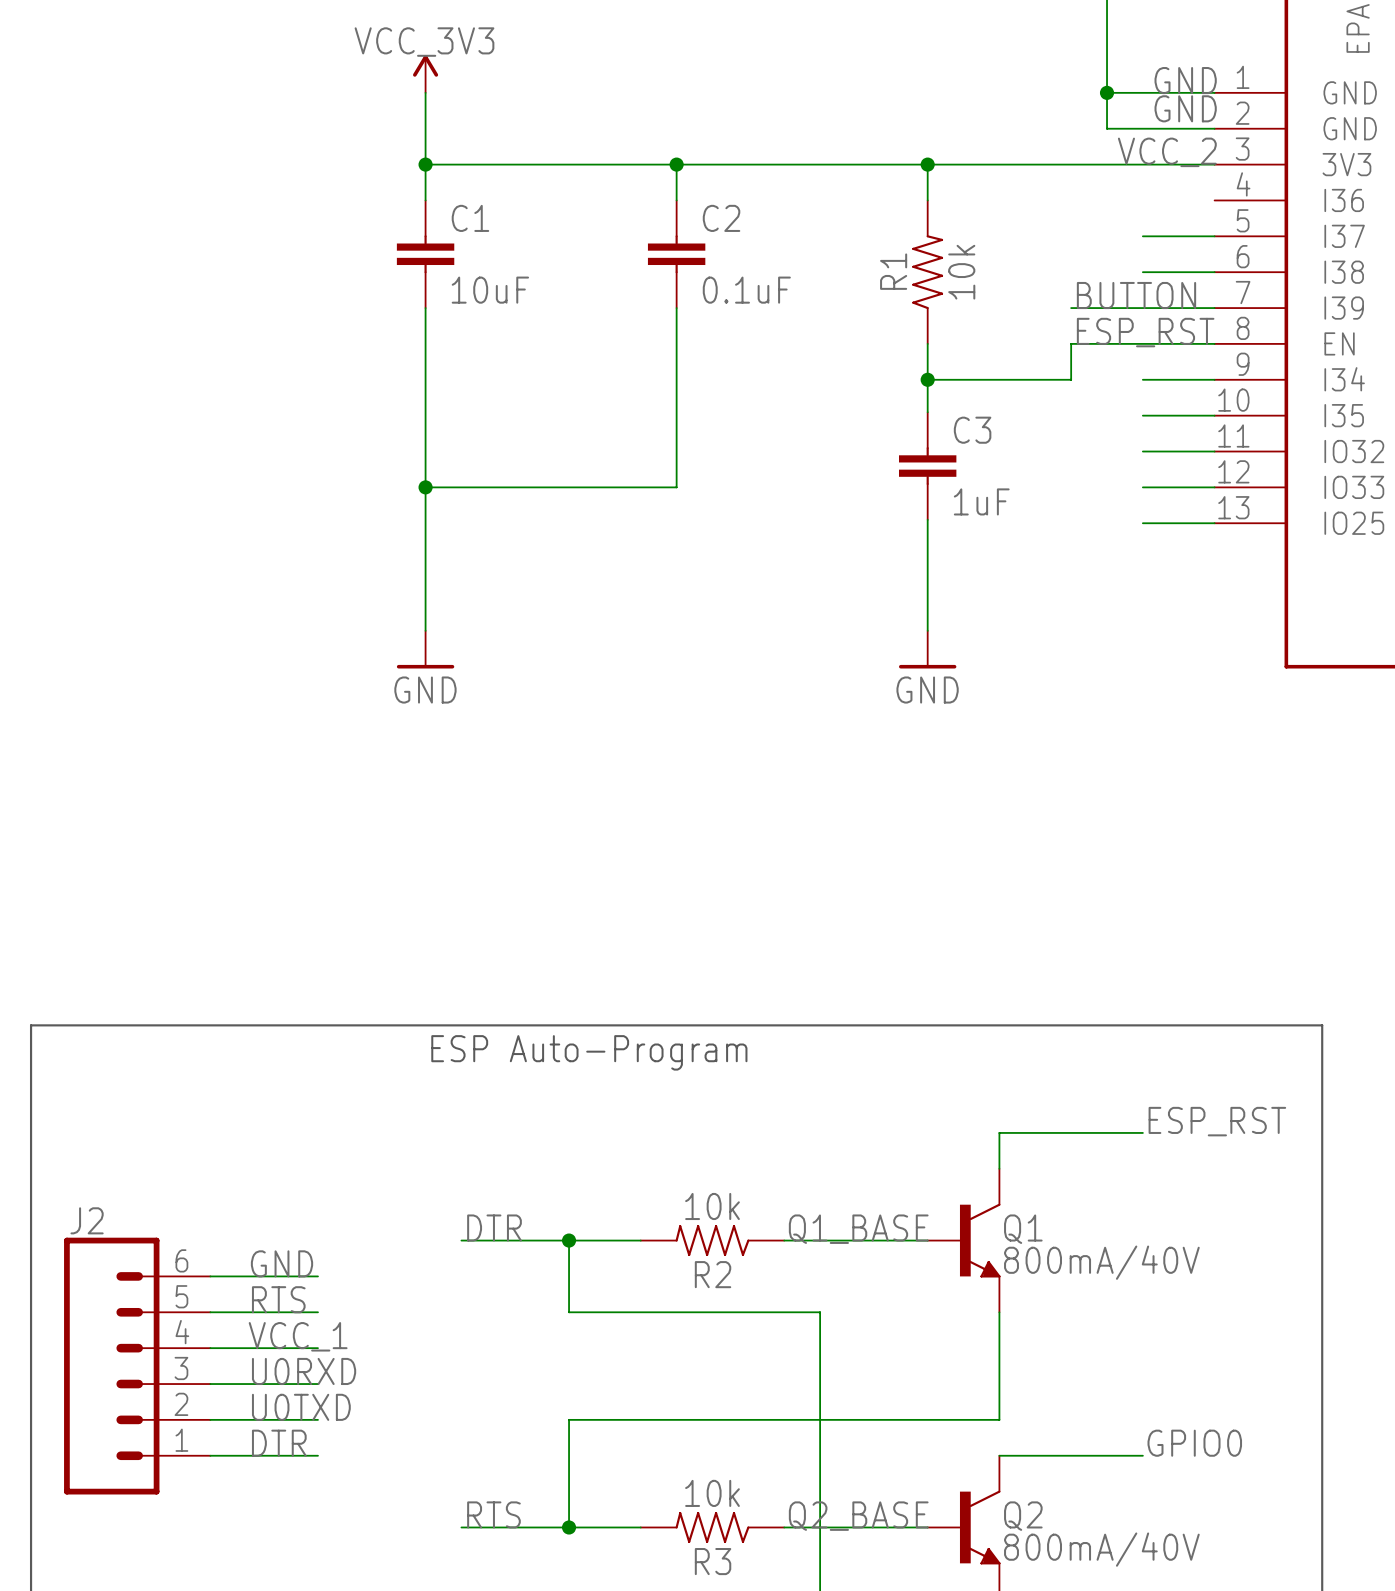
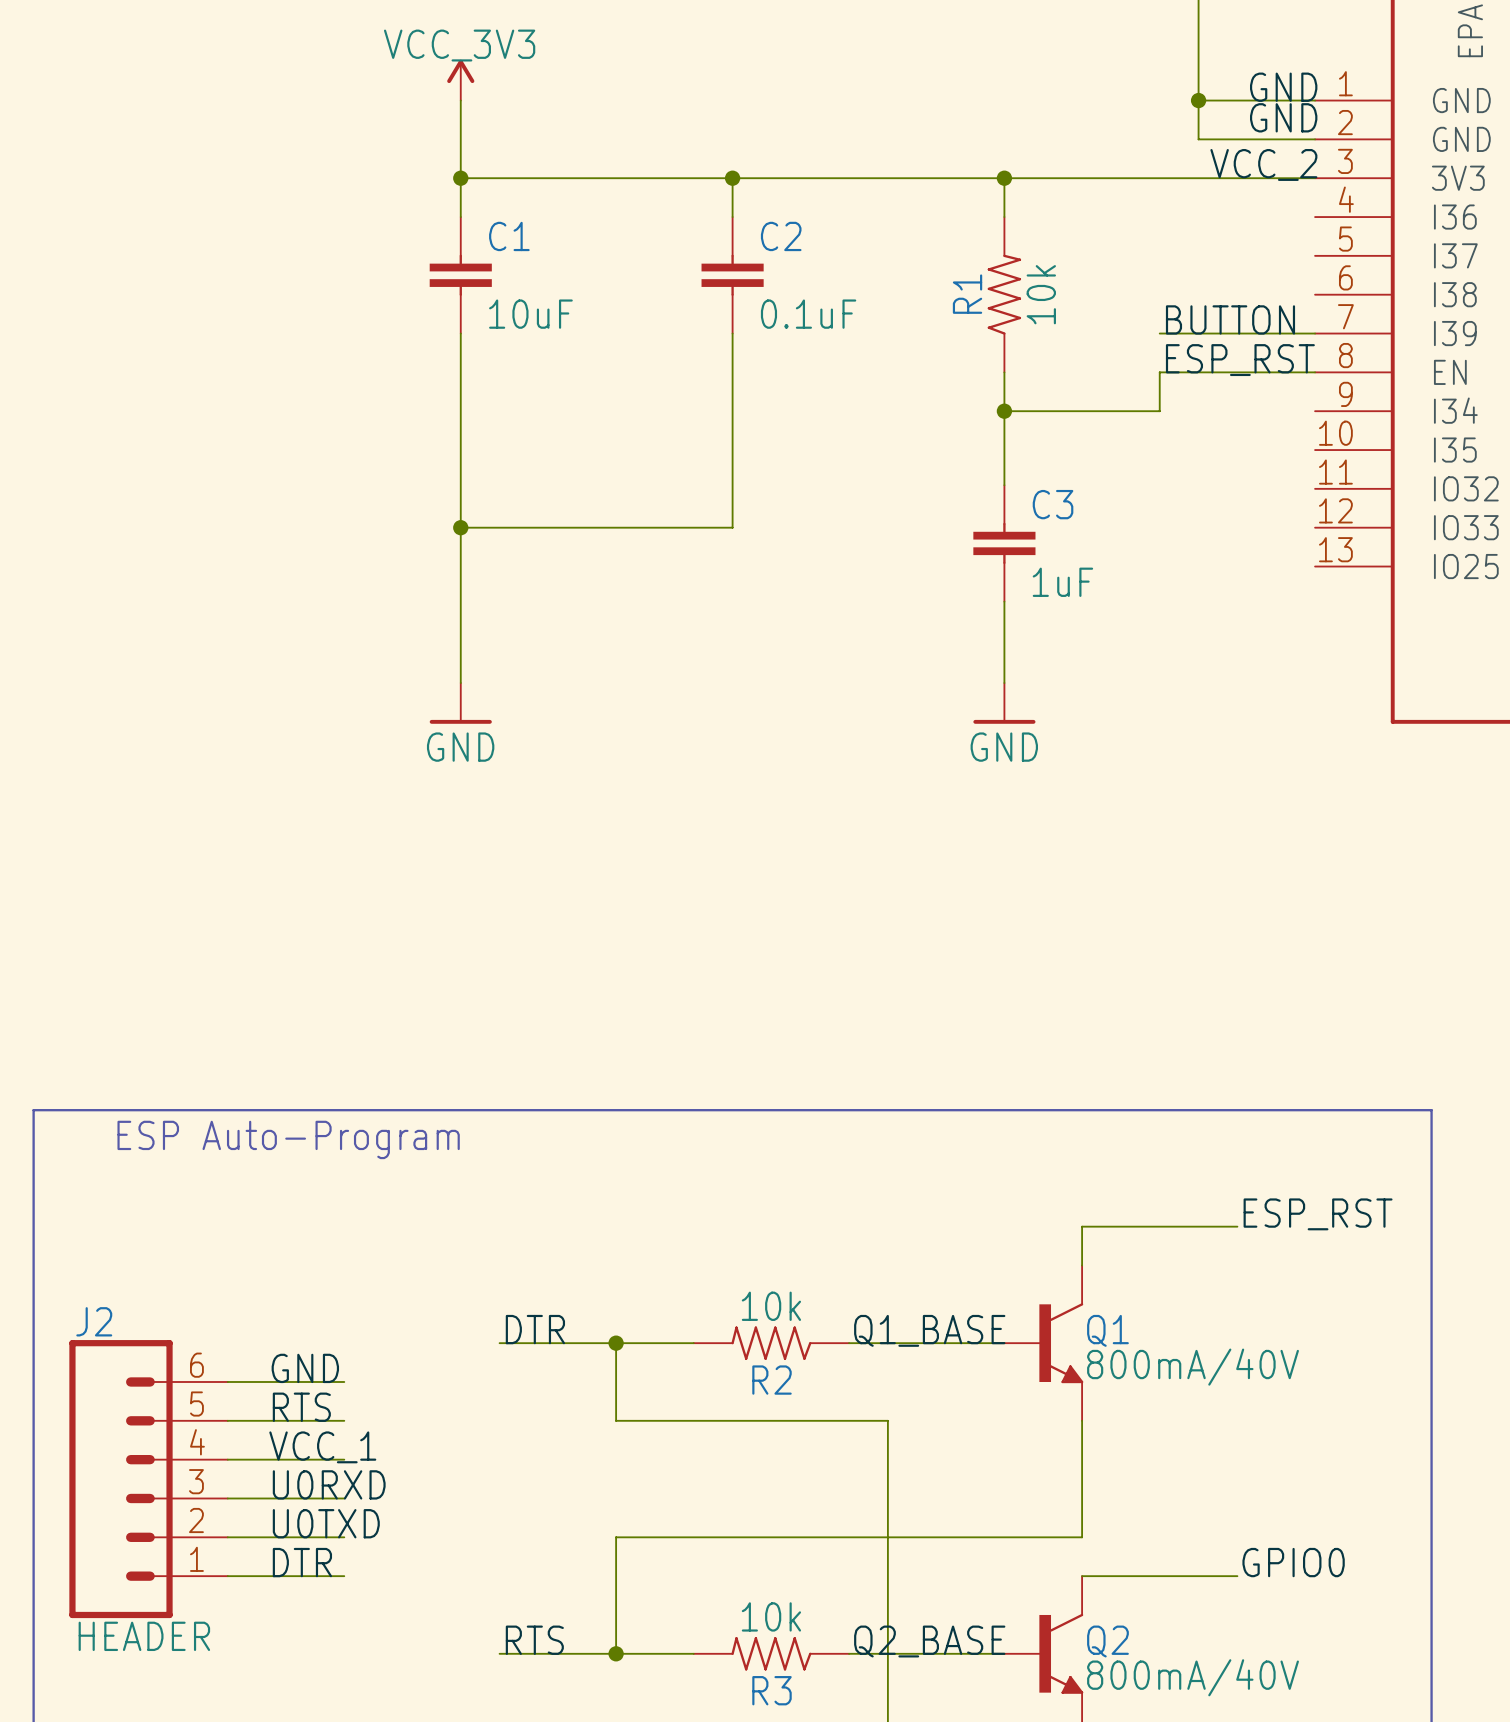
wire: (1142, 236) (1214, 236) -> none
wire: (1142, 272) (1214, 272) -> none
wire: (1142, 379) (1214, 379) -> none
wire: (1142, 415) (1214, 415) -> none
wire: (1142, 451) (1214, 451) -> none
C3 position: (927, 466) -> (1004, 543)
wire: (1142, 487) (1214, 487) -> none
wire: (1142, 523) (1214, 523) -> none
text position: ESP Auto-Program (589, 1052) -> ESP Auto-Program (288, 1139)
J2 value: none -> HEADER (144, 1636)

